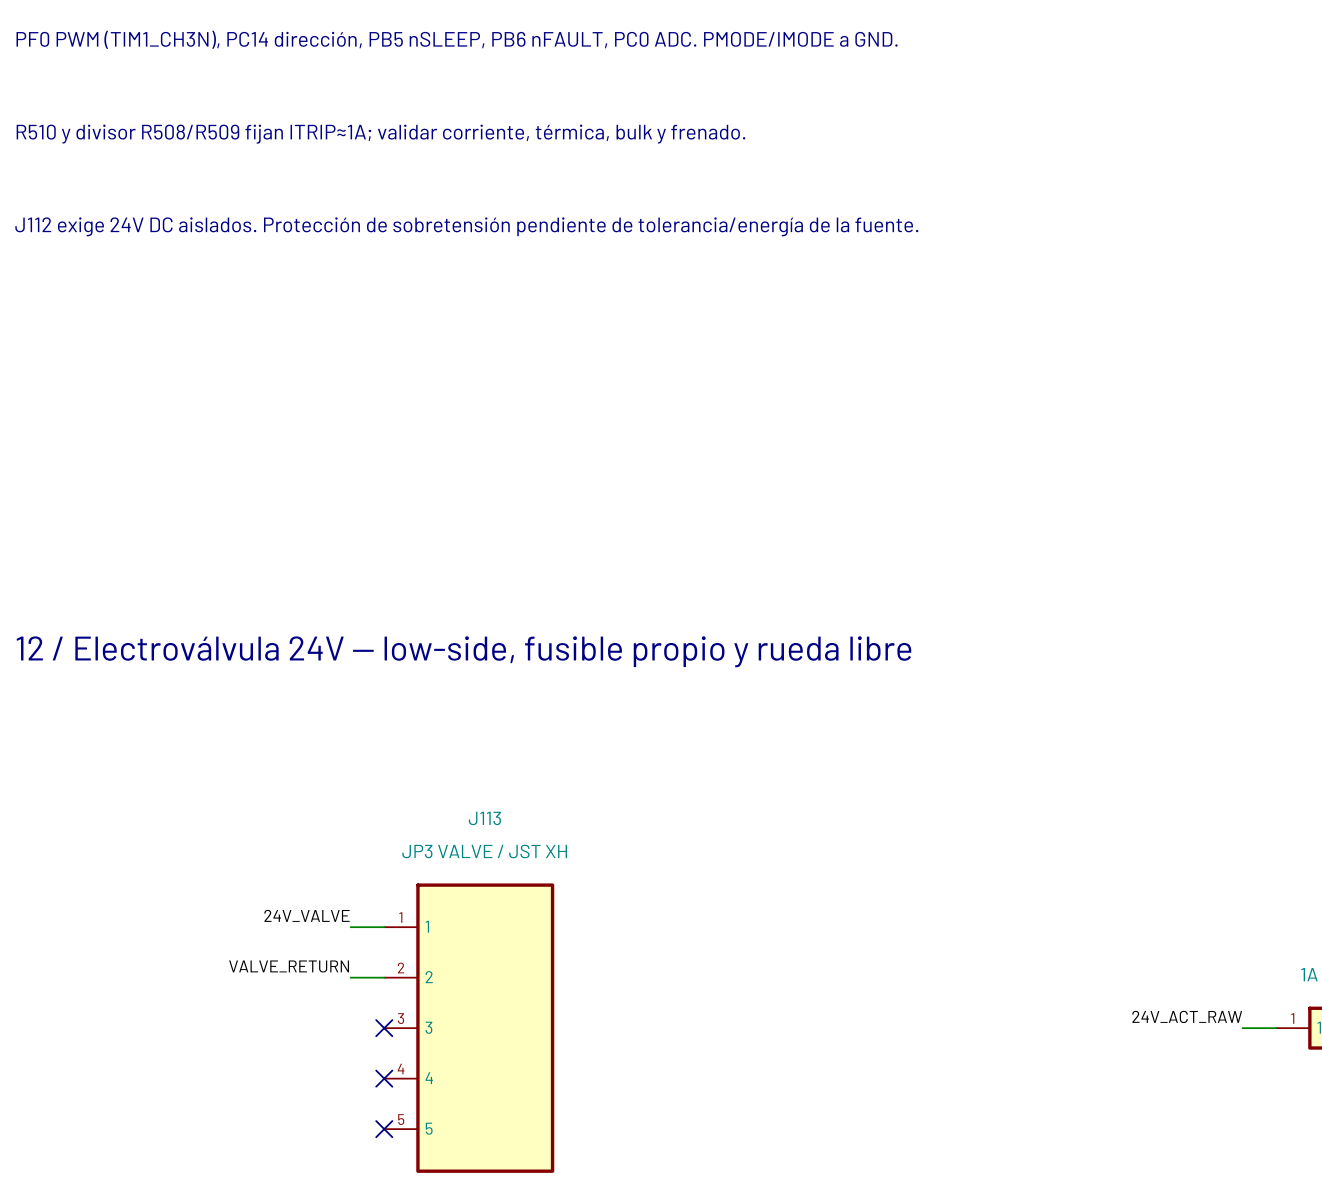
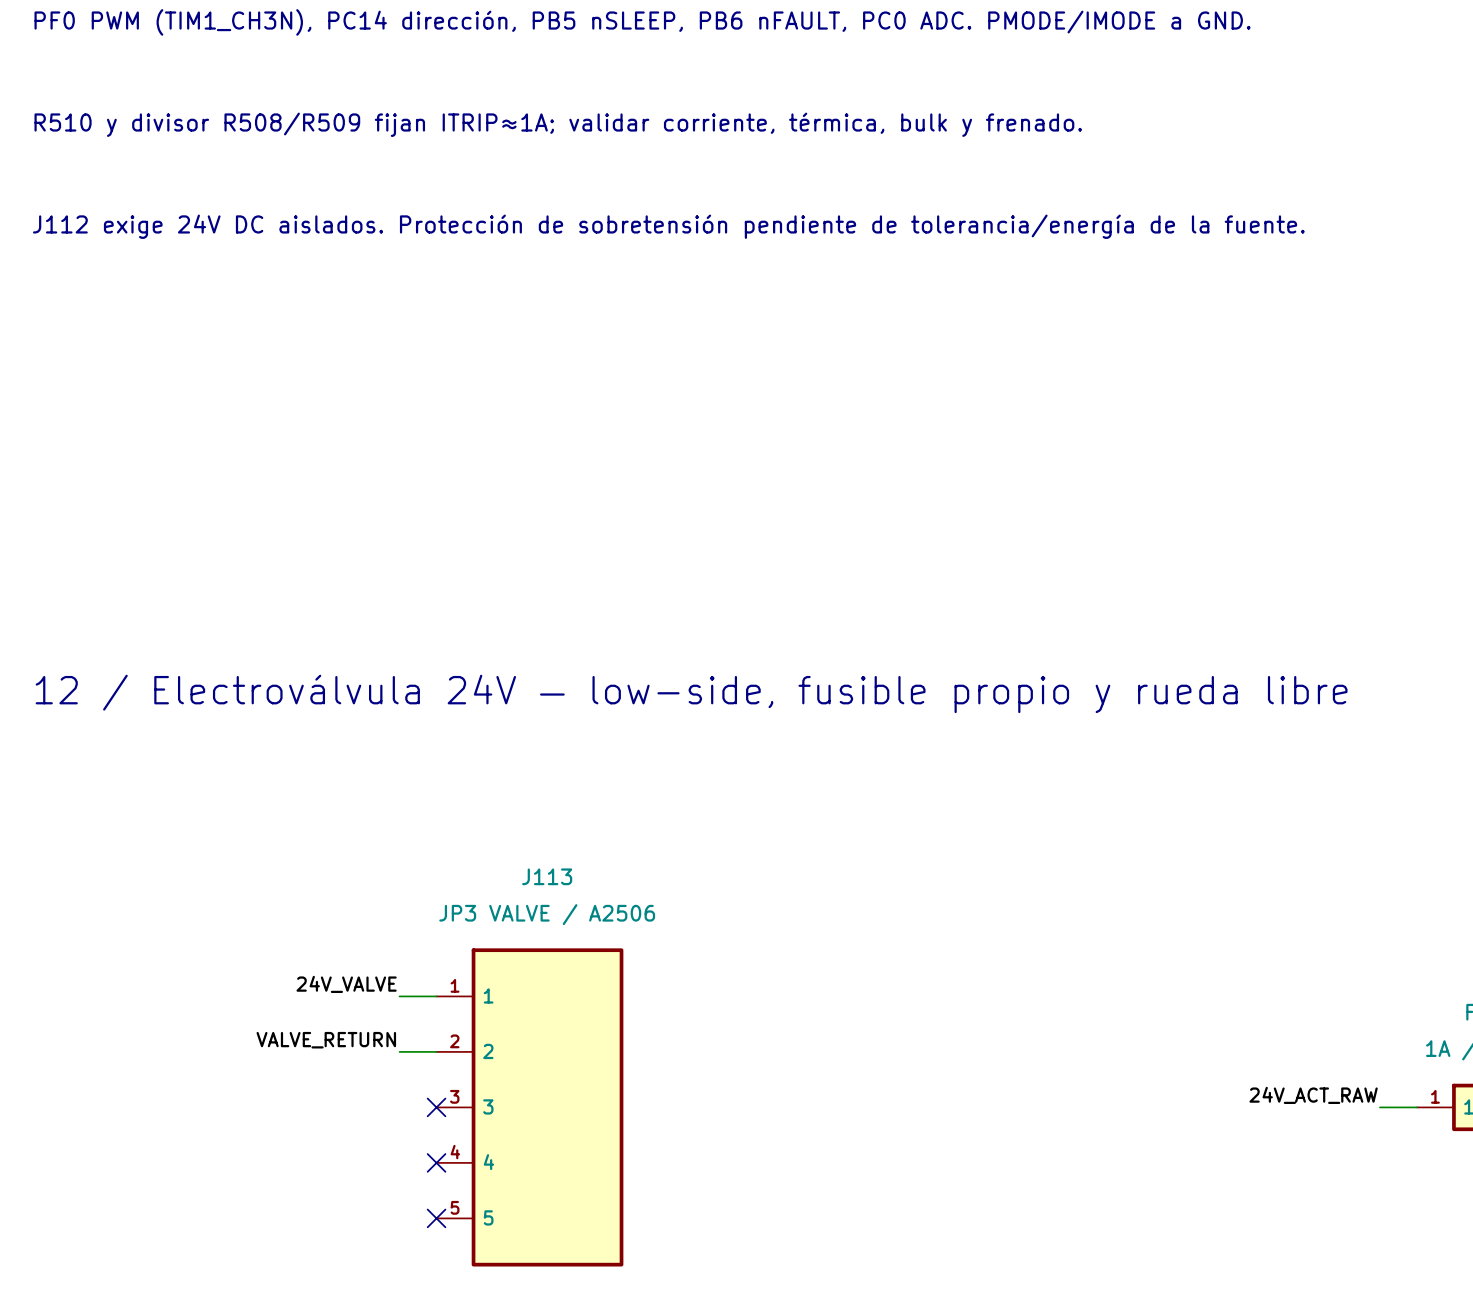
J113 value: JP3 VALVE / JST XH (484, 851) -> JP3 VALVE / A2506 (547, 914)

